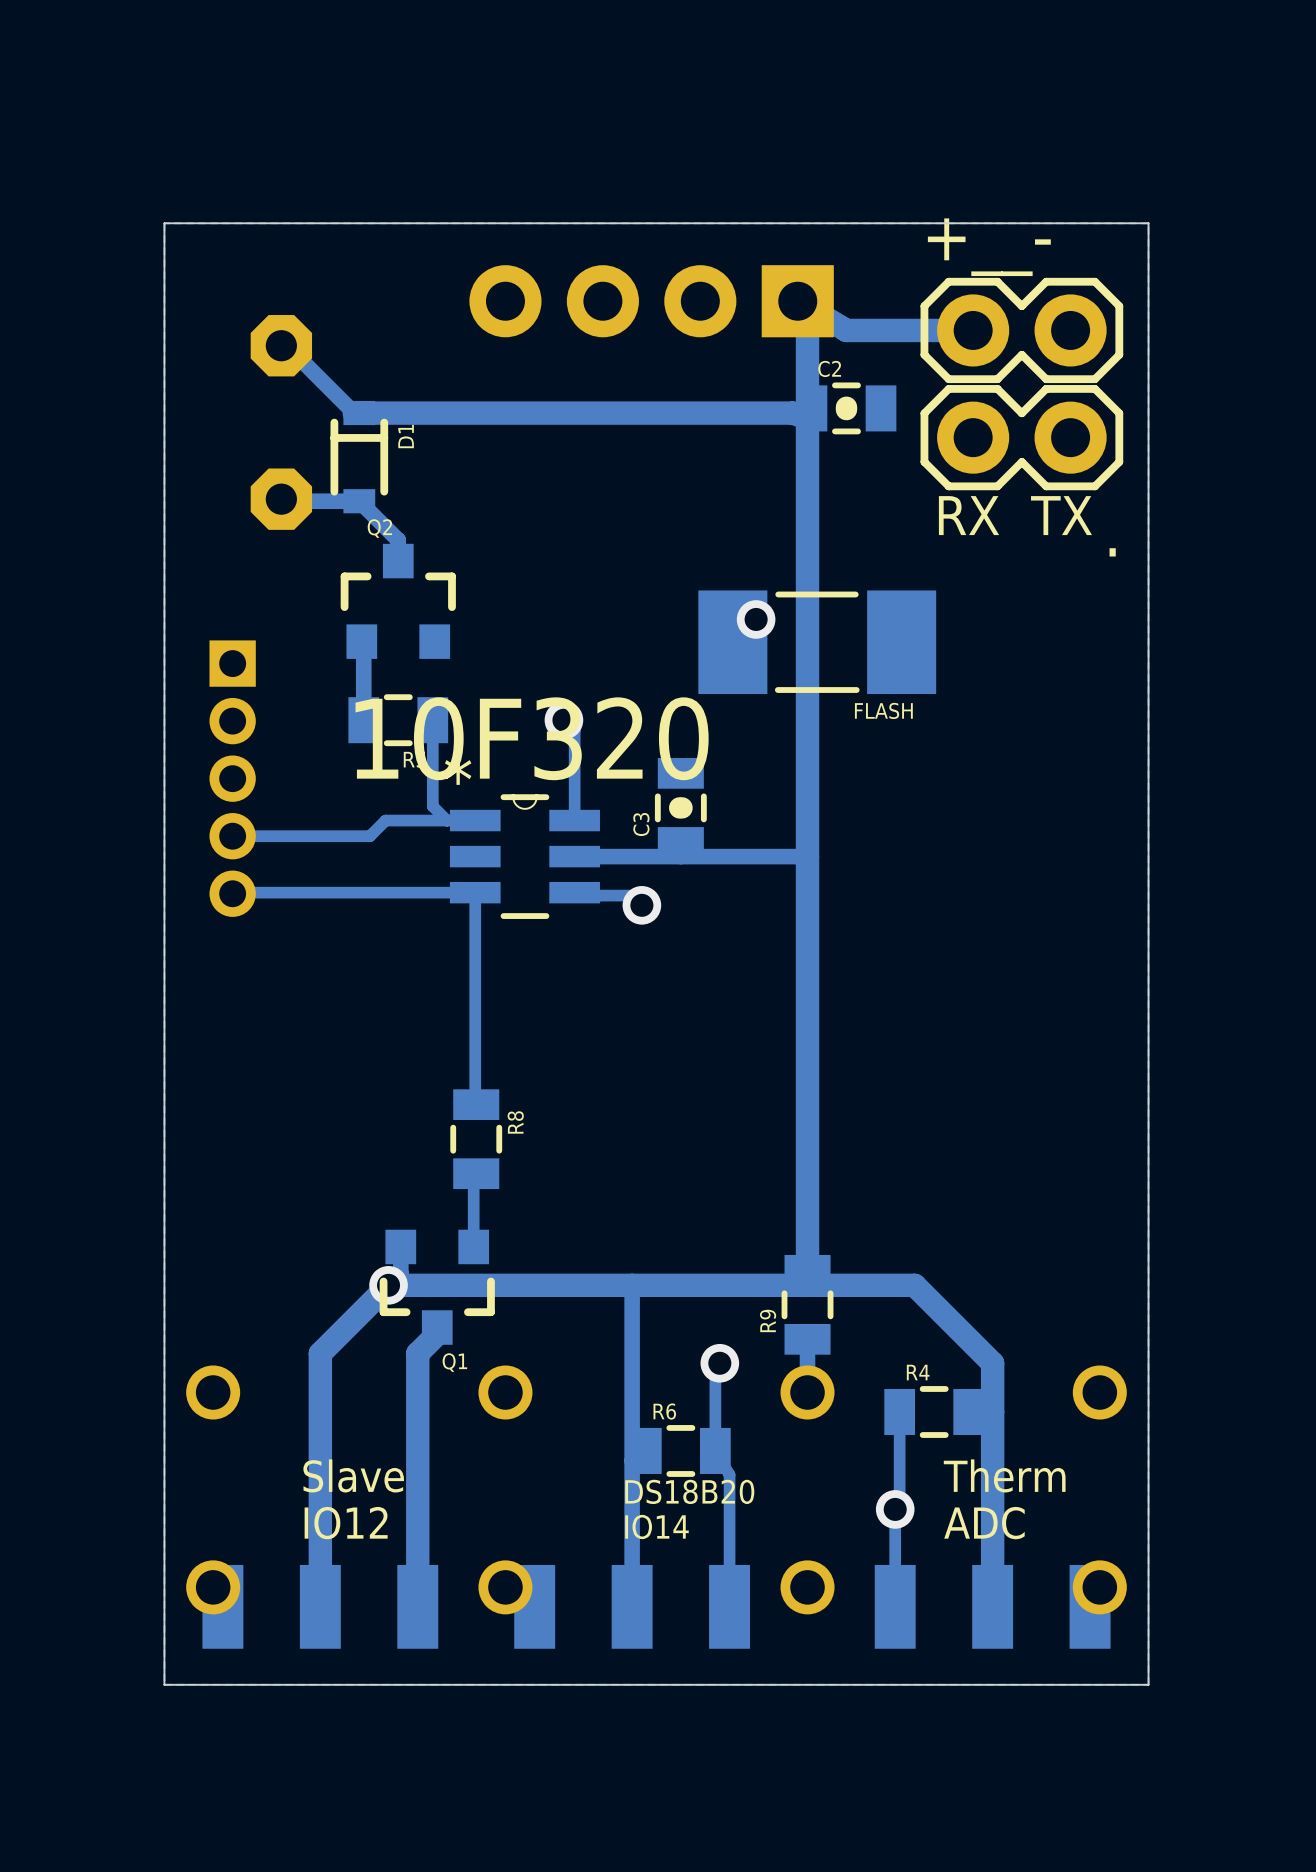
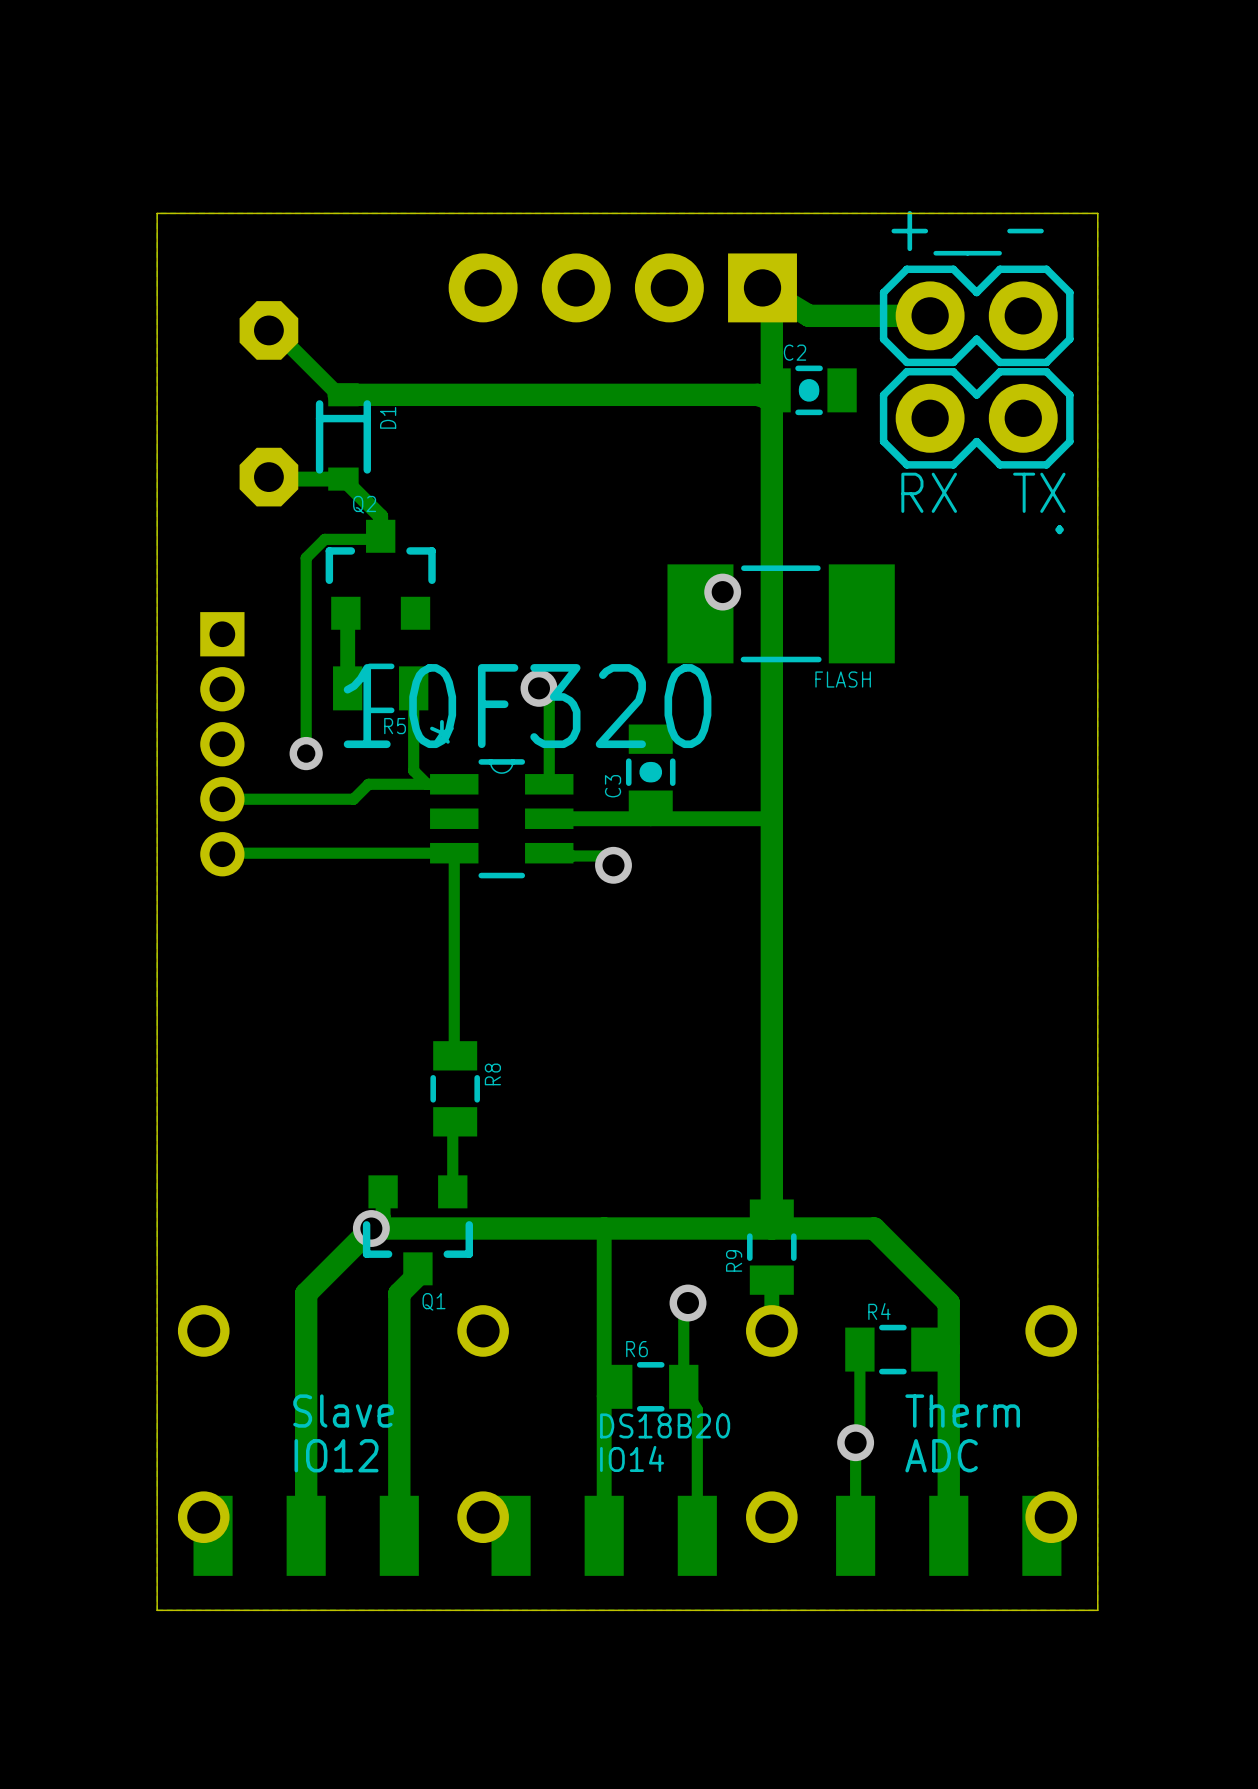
track: none -> (380, 536) (377, 539) (324, 539) (306, 557) (306, 753)
via: none -> (306, 753)

